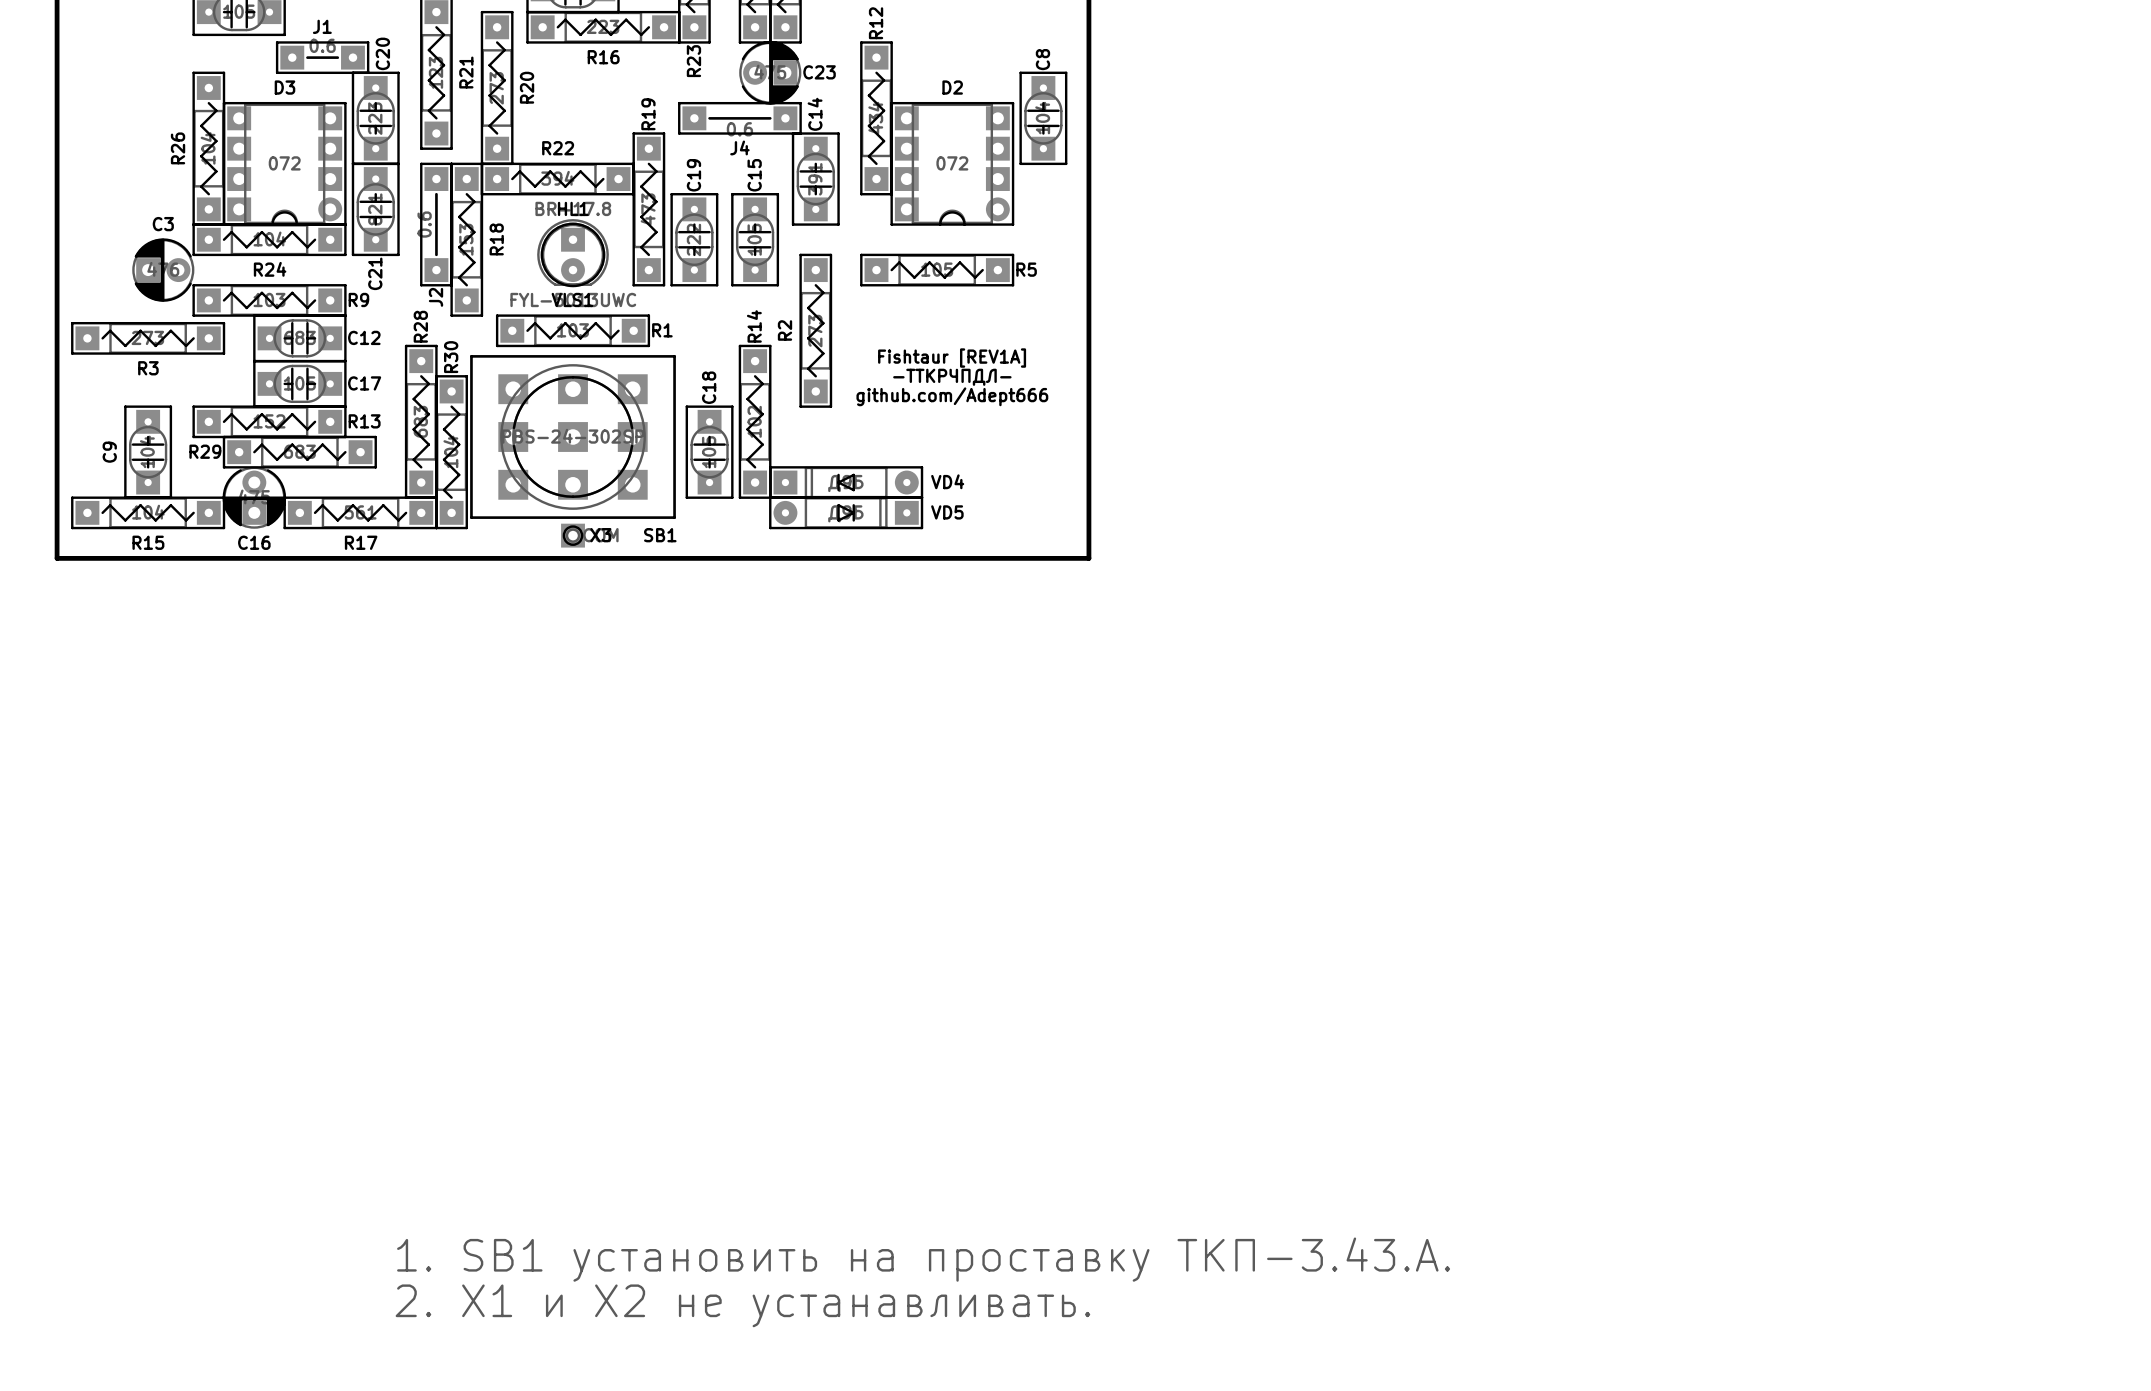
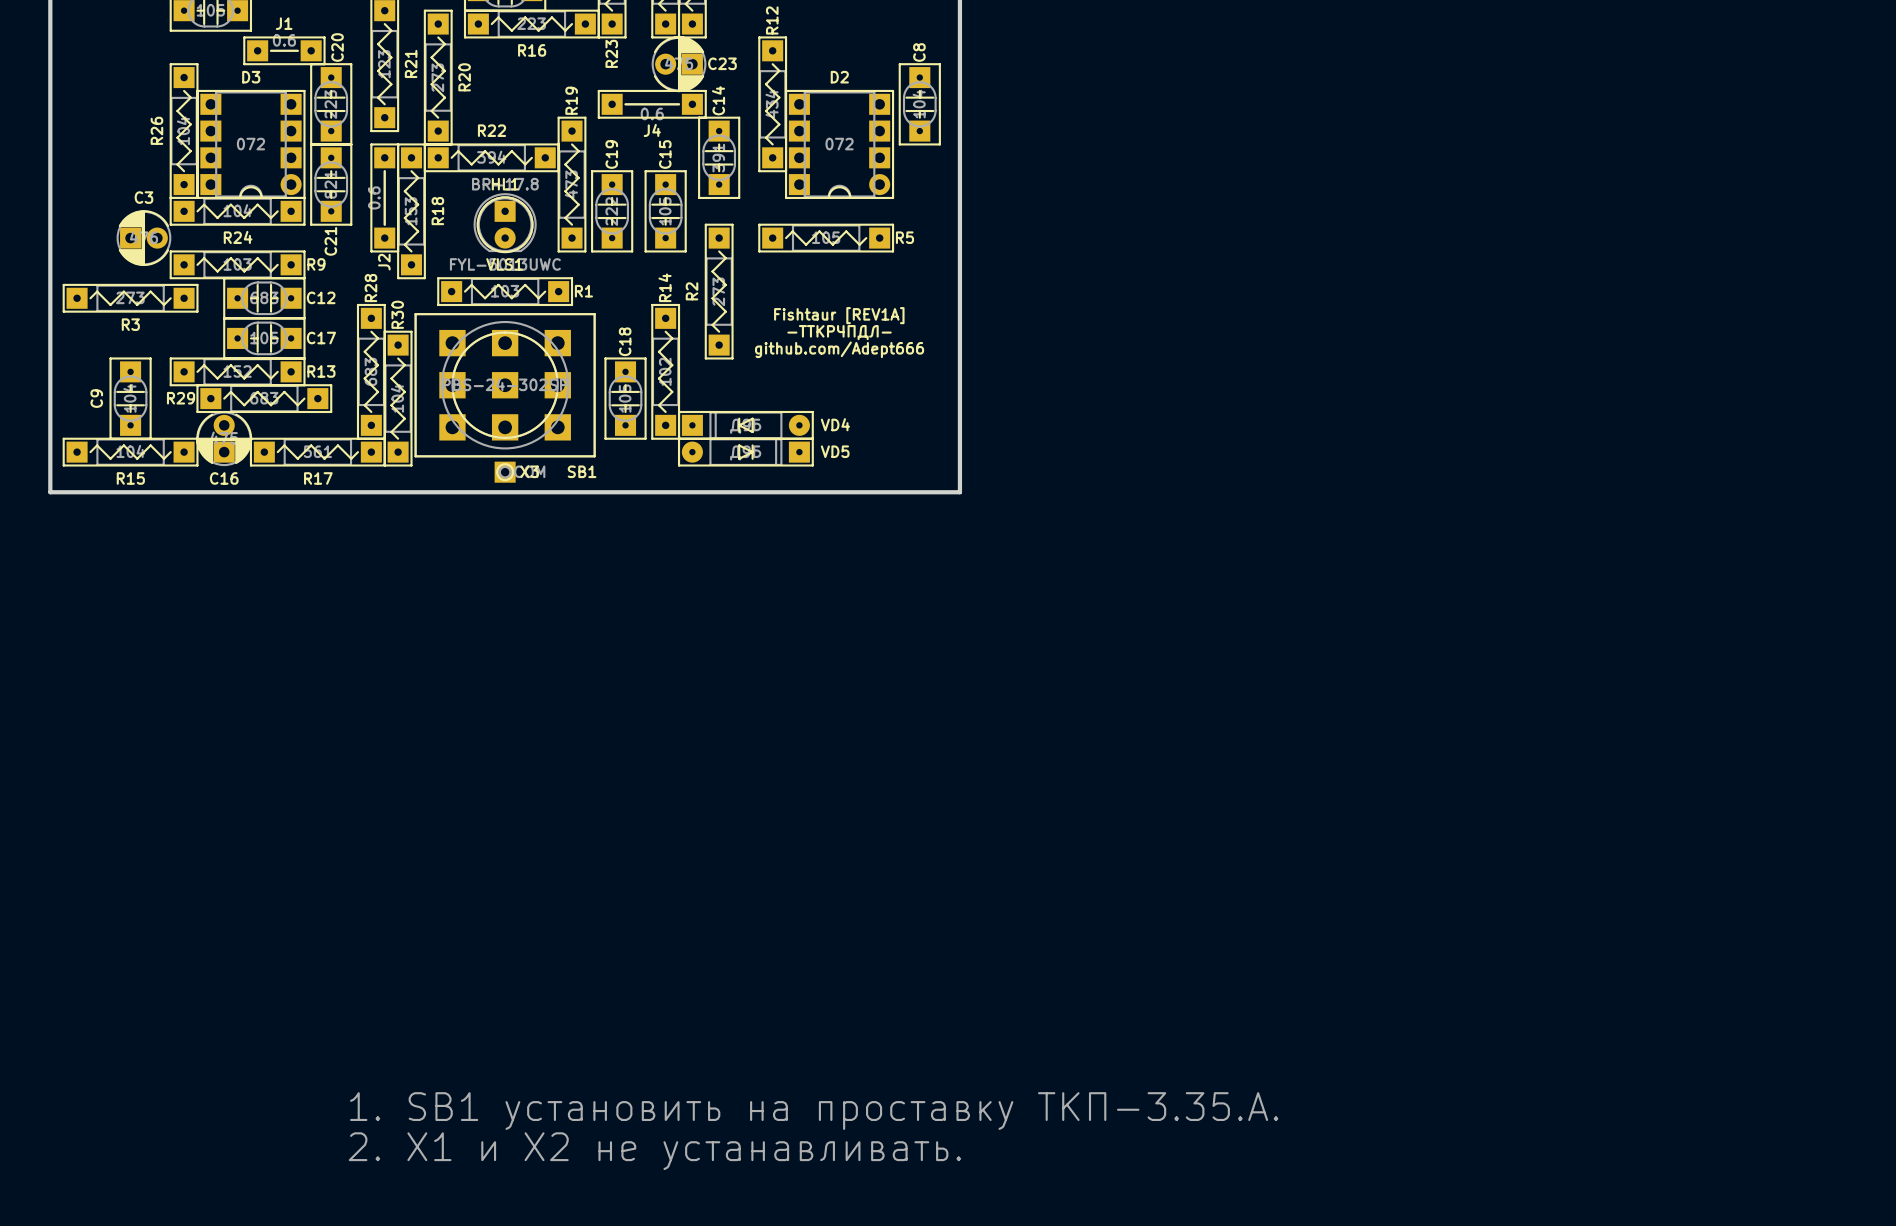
text: 1. SB1 установить на проставку ТКП-3.43.A. (923, 1259) -> 1. SB1 установить на проставку ТКП-3.35.A. (814, 1111)

